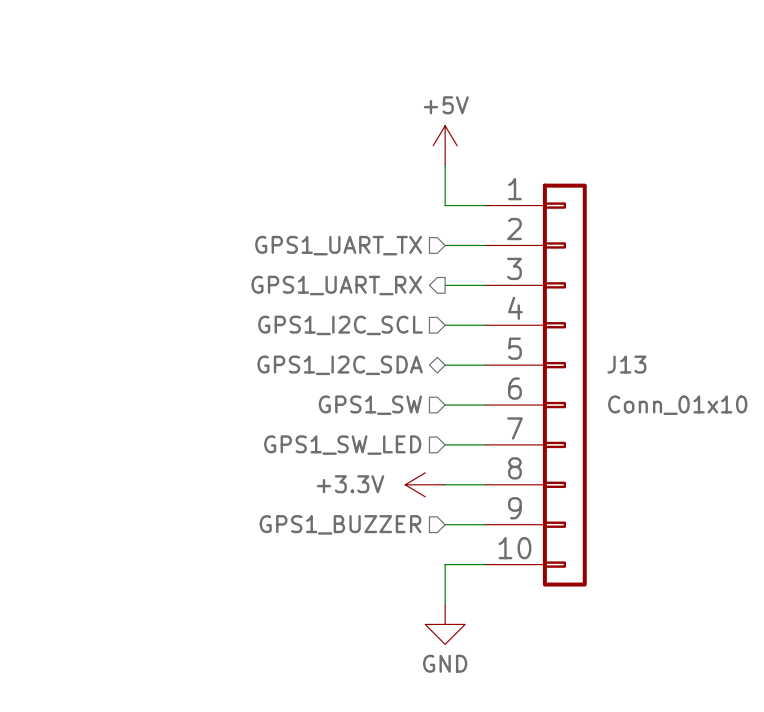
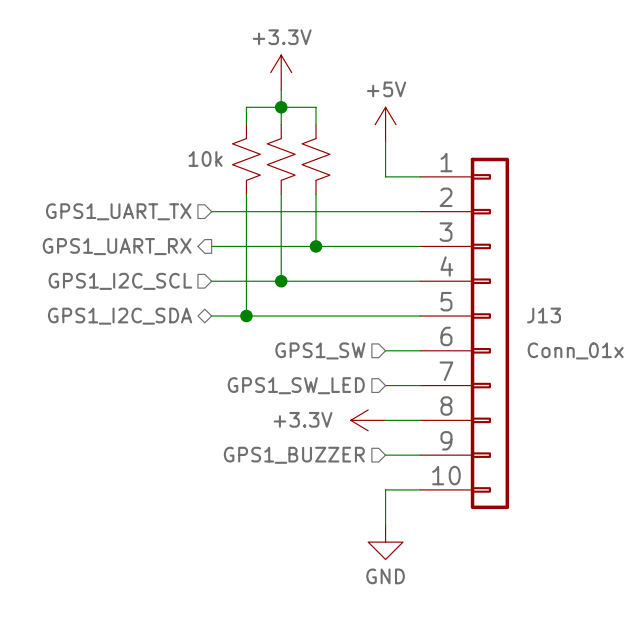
power symbol: none -> +3.3V (281, 72)
wire: none -> (281, 89) (281, 124)
junction: none -> (281, 107)
wire: none -> (246, 124) (246, 107) (316, 107) (316, 124)
part: none -> (246, 159)
part: none -> (281, 159)
part: none -> 10k (316, 159)
wire: none -> (246, 194) (246, 316)
wire: none -> (281, 194) (281, 281)
wire: none -> (316, 194) (316, 246)
wire: none -> (211, 211) (385, 211)
hierarchical label position: GPS1_UART_TX (338, 245) -> GPS1_UART_TX (118, 211)
wire: none -> (211, 246) (385, 246)
hierarchical label position: GPS1_UART_RX (336, 285) -> GPS1_UART_RX (117, 246)
junction: none -> (316, 246)
wire: none -> (211, 281) (385, 281)
junction: none -> (281, 281)
hierarchical label position: GPS1_I2C_SCL (340, 325) -> GPS1_I2C_SCL (120, 281)
wire: none -> (211, 316) (385, 316)
junction: none -> (246, 316)
hierarchical label position: GPS1_I2C_SDA (340, 365) -> GPS1_I2C_SDA (120, 316)

